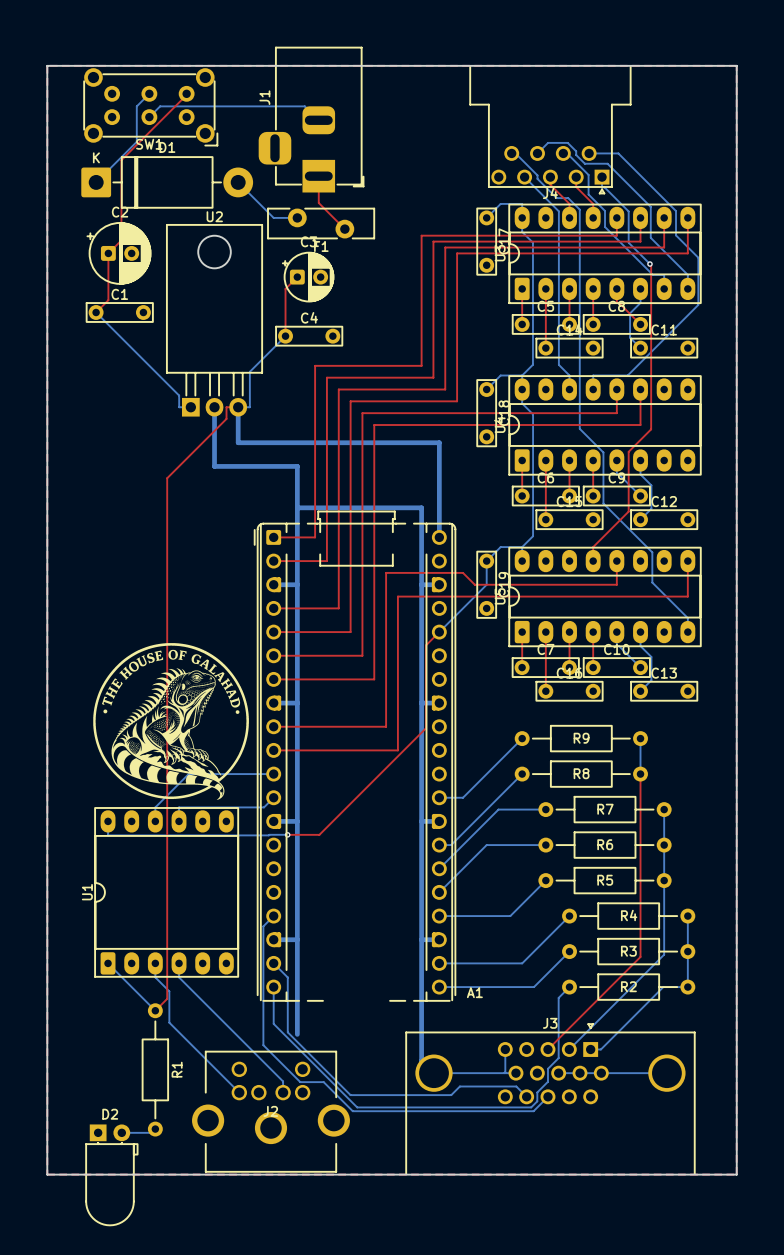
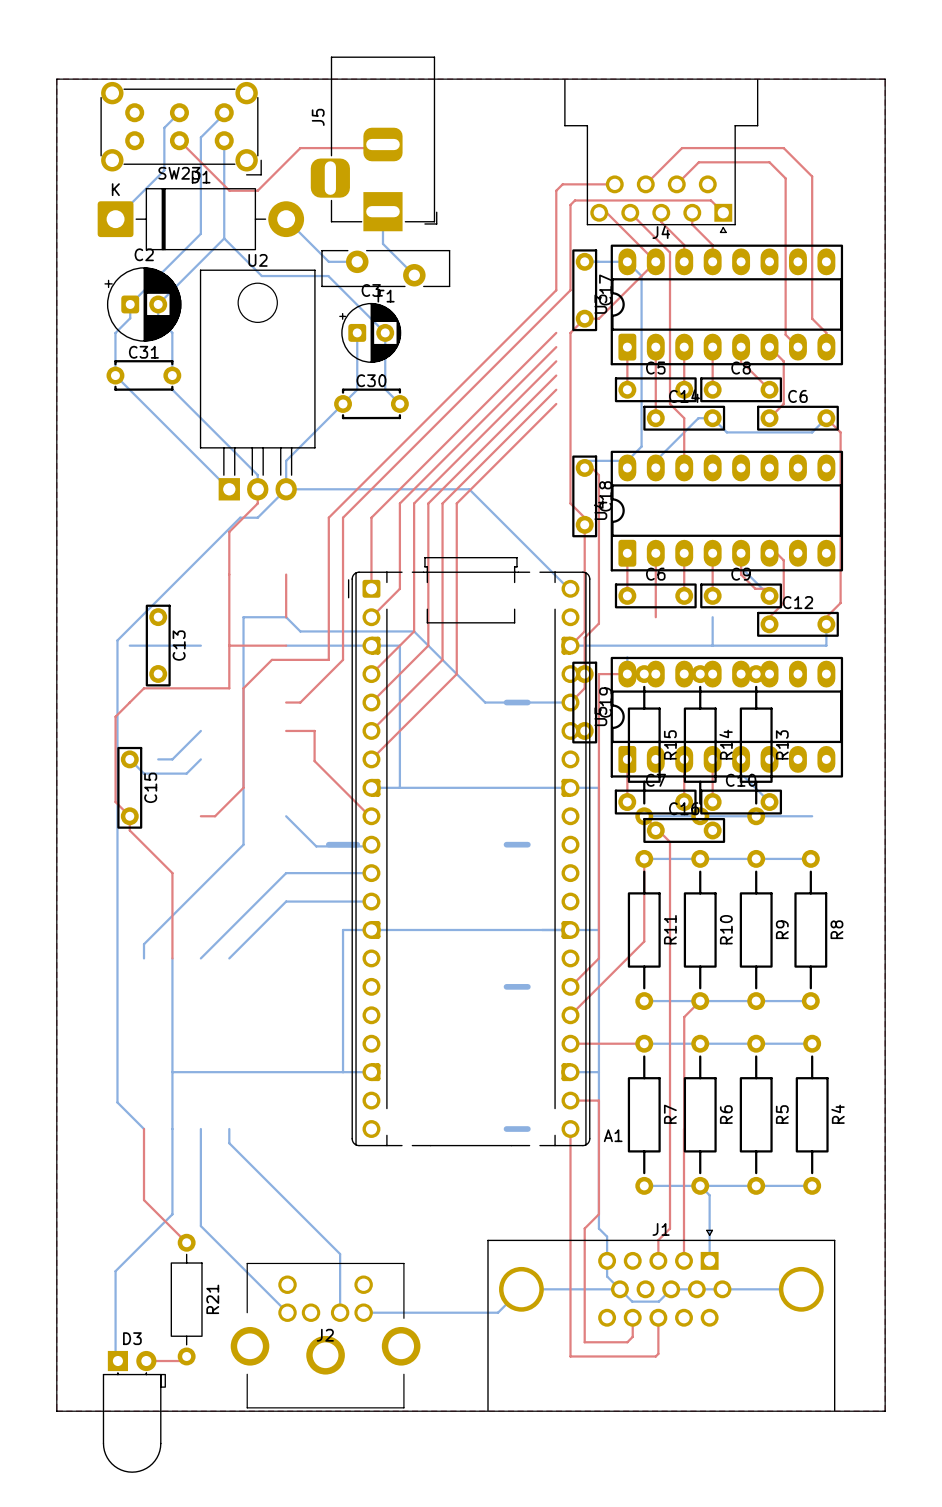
top track: (186, 93) (121, 160) (121, 240) (108, 253) (108, 300) (96, 312) -> none
J1 name: J1 (264, 97) -> J5 (318, 117)
top track: none -> (179, 140) (229, 190) (257, 190) (300, 148) (379, 148) (382, 144)
bottom track: (149, 117) (160, 106) (304, 106) (318, 120) -> none
bottom track: none -> (224, 140) (224, 238)
SW1 name: SW1 (149, 144) -> SW23 (179, 173)
top track: none -> (614, 184) (562, 184) (556, 190) (556, 290) (328, 517) (328, 659) (271, 659) (243, 688) (243, 787) (215, 816) (200, 816)
bottom track: (511, 153) (515, 153) (556, 198) (568, 198) (579, 209) (579, 428) (603, 452) (603, 503) (652, 552) (652, 582) (687, 618) (687, 632) -> none
top track: none -> (645, 184) (682, 148) (783, 148) (812, 176) (812, 318) (826, 332) (826, 347)
bottom track: (537, 153) (548, 142) (567, 142) (584, 163) (607, 163) (650, 206) (650, 237) (687, 274) (687, 288) -> none
top track: none -> (676, 184) (698, 162) (769, 162) (785, 178) (785, 334) (797, 347)
bottom track: (563, 153) (567, 153) (588, 174) (588, 194) (605, 210) (605, 227) (652, 274) (664, 274) (664, 288) -> none
bottom track: (589, 153) (618, 153) (676, 211) (676, 235) (698, 257) (698, 304) (627, 375) (593, 375) (593, 389) -> none
top track: (318, 176) (318, 203) (344, 229) -> none
bottom track: none -> (382, 211) (382, 243) (414, 275)
top track: none -> (599, 212) (606, 212) (655, 261) (598, 318) (584, 318) (570, 332) (570, 503) (584, 517) (584, 631) (570, 645)
top track: none -> (630, 212) (670, 252) (670, 403) (684, 418) (684, 460)
bottom track: (524, 177) (558, 211) (558, 364) (569, 375) (569, 389) -> none
top track: none -> (723, 212) (710, 200) (574, 200) (570, 204) (570, 290) (343, 517) (343, 659) (300, 702) (286, 702)
bottom track: (602, 177) (602, 187) (604, 187) (628, 211) (628, 242) (649, 264) -> none
bottom track: none -> (224, 238) (261, 276) (328, 276) (385, 332) (385, 389) (399, 403)
bottom track: none -> (224, 238) (158, 304) (158, 318) (172, 332) (172, 375)
bottom track: (486, 217) (500, 203) (522, 203) (522, 231) (532, 242) (532, 364) (522, 375) -> (584, 261) (627, 261) (641, 276) (641, 446) (627, 460) (584, 460)
top track: (616, 217) (616, 235) (421, 235) (421, 365) (315, 365) (315, 537) (273, 537) -> none
top track: (640, 217) (640, 241) (433, 241) (433, 377) (326, 377) (326, 561) (273, 561) -> none
top track: (664, 217) (664, 247) (445, 247) (445, 389) (338, 389) (338, 608) (273, 608) -> none
top track: (687, 217) (687, 253) (457, 253) (457, 401) (350, 401) (350, 632) (273, 632) -> none
top track: (649, 264) (651, 429) (628, 451) (628, 511) (593, 547) (593, 561) -> none
via: (649, 264) -> none
top track: (297, 277) (285, 288) (285, 336) -> none
bottom track: none -> (357, 332) (357, 389) (286, 460) (286, 489) (257, 517) (240, 517) (117, 640) (117, 1102) (144, 1129)
top track: none -> (556, 332) (371, 517) (371, 588)
top track: none -> (556, 347) (399, 503) (399, 588) (371, 617)
top track: none -> (769, 347) (783, 361) (783, 403) (769, 418)
bottom track: (640, 288) (640, 302) (630, 313) (630, 337) (640, 348) -> none
top track: none -> (556, 361) (414, 503) (414, 631) (371, 674)
bottom track: (96, 312) (179, 395) (179, 407) (190, 407) -> (224, 112) (200, 137) (200, 233) (130, 304) (130, 318) (115, 333) (115, 375) (229, 489)
C1: (119, 312) -> none
C31: none -> (143, 375)
top track: none -> (556, 375) (428, 503) (428, 645) (371, 702)
top track: none -> (556, 389) (442, 503) (442, 659) (371, 730)
C11 name: C11 (664, 329) -> C6 (797, 396)
bottom track: (285, 336) (249, 371) (249, 407) -> (570, 590) (469, 489) (300, 489)
C4: (309, 336) -> none
C30: none -> (371, 403)
top track: none -> (556, 403) (456, 503) (456, 674) (371, 759)
top track: none -> (826, 418) (840, 432) (840, 603) (826, 617)
bottom track: none -> (826, 418) (812, 432) (726, 432) (712, 418) (698, 418) (655, 460)
bottom track: (522, 375) (500, 375) (486, 389) -> none
bottom track: (522, 375) (522, 403) (533, 414) (533, 536) (522, 547) (500, 547) (486, 561) (486, 584) (439, 632) -> none
top track: none -> (584, 460) (598, 475) (598, 623) (584, 637) (584, 688) (570, 702)
top track: (616, 389) (616, 413) (362, 413) (362, 655) (273, 655) -> none
top track: (640, 389) (640, 425) (374, 425) (374, 679) (273, 679) -> none
top track: none -> (257, 489) (257, 503) (229, 531) (229, 688) (144, 688) (115, 716) (115, 802) (129, 816) (129, 830) (172, 873) (172, 958)
bottom track: (214, 407) (214, 466) (297, 466) (297, 1034) -> (257, 489) (257, 475) (172, 389)
top track: (238, 407) (226, 407) (226, 418) (167, 478) (167, 998) (155, 1010) -> none
bottom track: (238, 407) (238, 442) (439, 442) (439, 537) -> none
top track: none -> (741, 546) (741, 574) (755, 588) (769, 588)
top track: none -> (769, 546) (783, 560) (783, 603) (769, 617)
bottom track: (640, 460) (640, 474) (651, 485) (651, 508) (640, 519) -> none
top track: none -> (286, 574) (286, 617)
bottom track: (297, 507) (421, 507) (421, 1060) (433, 1073) -> (363, 1312) (498, 1312) (521, 1289)
A1 footprint: [254, 510, 456, 1002] -> [347, 557, 591, 1147]
bottom track: none -> (712, 617) (712, 645)
bottom track: none -> (826, 617) (826, 645) (570, 645)
C15 rotation: 0° (569, 519) -> 90° clockwise (129, 787)
C15 position: (569, 519) -> (129, 787)
bottom track: none -> (129, 645) (200, 645)
top track: none -> (229, 645) (286, 645)
bottom track: none -> (286, 645) (369, 645) (371, 647)
bottom track: none -> (371, 645) (399, 645) (399, 787)
top track: none -> (644, 674) (598, 674) (598, 958) (570, 986)
top track: (616, 561) (616, 584) (474, 584) (463, 572) (386, 572) (386, 726) (273, 726) -> none
top track: (687, 561) (687, 596) (397, 596) (397, 750) (273, 750) -> none
bottom track: (273, 584) (297, 584) -> none
bottom track: none -> (506, 702) (485, 702) (414, 631) (300, 631) (286, 617) (243, 617) (243, 844) (144, 944) (144, 958)
bottom track: none -> (527, 702) (570, 702)
bottom track: none -> (200, 730) (172, 759) (158, 759)
top track: none -> (286, 730) (314, 730) (314, 761) (371, 817)
R15: none -> (644, 745)
R14: none -> (700, 745)
R13: none -> (756, 745)
bottom track: none -> (129, 759) (144, 773) (186, 773) (200, 759)
top track: (439, 632) (425, 645) (425, 728) (319, 834) (287, 834) -> none
top track: (545, 632) (545, 691) -> none
bottom track: (640, 632) (640, 646) (651, 656) (651, 680) (640, 691) -> none
drawing: [93, 643, 249, 800] -> none
bottom track: none -> (371, 789) (373, 787) (598, 787) (598, 1228) (607, 1236) (607, 1260)
bottom track: none -> (286, 816) (316, 846) (371, 846)
bottom track: none -> (644, 816) (812, 816)
C13 rotation: 0° (664, 691) -> 90° clockwise (158, 645)
C13 position: (664, 691) -> (158, 645)
top track: none -> (644, 858) (644, 941) (570, 1015)
bottom track: none -> (644, 858) (810, 858)
bottom track: none -> (371, 873) (286, 873) (200, 958)
bottom track: (522, 738) (463, 797) (439, 797) -> none
R9 rotation: 0° (581, 738) -> 90° clockwise (756, 929)
R9 name position: R9 (581, 738) -> R9 (782, 929)
bottom track: (640, 738) (640, 774) -> none
bottom track: none -> (371, 901) (286, 901) (229, 958)
R8 name position: R8 (581, 773) -> R8 (836, 929)
bottom track: (273, 774) (188, 774) (155, 807) (155, 821) -> none
bottom track: none -> (598, 929) (343, 929) (343, 1072)
bottom track: (522, 774) (451, 845) (439, 845) -> none
R11: none -> (644, 929)
R8 rotation: 0° (581, 774) -> 90° clockwise (810, 929)
R8 position: (581, 774) -> (810, 929)
R10: none -> (700, 929)
top track: (640, 774) (640, 956) (547, 1049) -> (644, 816) (670, 842) (670, 1228) (658, 1240) (658, 1260)
bottom track: none -> (172, 958) (172, 1214) (115, 1271) (115, 1358) (117, 1361)
bottom track: (273, 797) (264, 807) (179, 807) (179, 821) -> none
bottom track: (545, 809) (498, 809) (439, 868) -> none
R7 rotation: 0° (605, 809) -> 90° clockwise (644, 1114)
R7 position: (605, 809) -> (644, 1114)
R7 name position: R7 (605, 809) -> R7 (670, 1114)
bottom track: (664, 809) (664, 954) (569, 1049) -> none
bottom track: (108, 821) (108, 835) (287, 834) -> none
bottom track: (273, 821) (297, 821) -> none
bottom track: none -> (644, 1001) (810, 1001)
top track: none -> (700, 1001) (684, 1017) (684, 1260)
via: (287, 834) -> none
R6 name position: R6 (605, 844) -> R6 (726, 1114)
bottom track: (545, 845) (486, 845) (439, 892) -> none
R6 rotation: 0° (605, 845) -> 90° clockwise (700, 1114)
R6 position: (605, 845) -> (700, 1114)
top track: none -> (570, 1043) (644, 1043)
bottom track: none -> (644, 1043) (812, 1043)
bottom track: (545, 880) (510, 916) (439, 916) -> none
R5 rotation: 0° (605, 880) -> 90° clockwise (756, 1114)
R5 name position: R5 (605, 880) -> R5 (782, 1114)
bottom track: none -> (172, 1072) (371, 1072)
U1: (166, 892) -> none
R4 name position: R4 (629, 915) -> R4 (838, 1114)
bottom track: (273, 916) (263, 926) (263, 1045) (300, 1082) (323, 1082) (352, 1111) (533, 1111) (547, 1096) -> none
top track: none -> (570, 1100) (598, 1100) (598, 1214) (584, 1228) (584, 1342) (627, 1342) (632, 1336) (632, 1317)
bottom track: (569, 916) (522, 963) (439, 963) -> none
R4 rotation: 0° (628, 916) -> 90° clockwise (812, 1114)
bottom track: (687, 916) (687, 987) (676, 987) -> none
top track: none -> (144, 1129) (144, 1200) (186, 1242)
bottom track: (273, 939) (297, 939) -> (570, 1072) (598, 1072)
top track: none -> (570, 1129) (570, 1356) (655, 1356) (658, 1353) (658, 1317)
bottom track: (569, 951) (534, 987) (439, 987) -> none
R3: (628, 951) -> none
bottom track: (108, 963) (155, 1010) -> none
bottom track: (155, 963) (155, 977) (169, 991) (169, 1022) -> (200, 1129) (200, 1226) (203, 1228)
bottom track: (179, 963) (179, 977) (283, 1081) -> (229, 1129) (229, 1143) (340, 1254) (340, 1299)
bottom track: (273, 963) (287, 977) (287, 1032) (350, 1095) (451, 1095) (459, 1086) (516, 1086) (526, 1096) -> none
bottom track: (273, 987) (273, 1023) (357, 1107) (531, 1107) (537, 1101) (537, 1092) (547, 1081) (547, 1068) (558, 1058) (558, 997) (569, 987) -> none
bottom track: none -> (644, 1185) (796, 1185)
R2: (628, 987) -> none
bottom track: (663, 987) (600, 1049) (590, 1049) -> (700, 1185) (709, 1195) (709, 1260)
J3 name: J3 (550, 1023) -> J1 (661, 1229)
bottom track: (505, 1062) (504, 1073) -> (607, 1276) (632, 1301) (658, 1301) (671, 1289)
R1: (155, 1069) -> none
R21: none -> (186, 1299)
D2 name: D2 (110, 1114) -> D3 (132, 1338)
top track: none -> (186, 1356) (182, 1361) (146, 1361)
bottom track: (155, 1129) (151, 1132) (121, 1132) -> none

